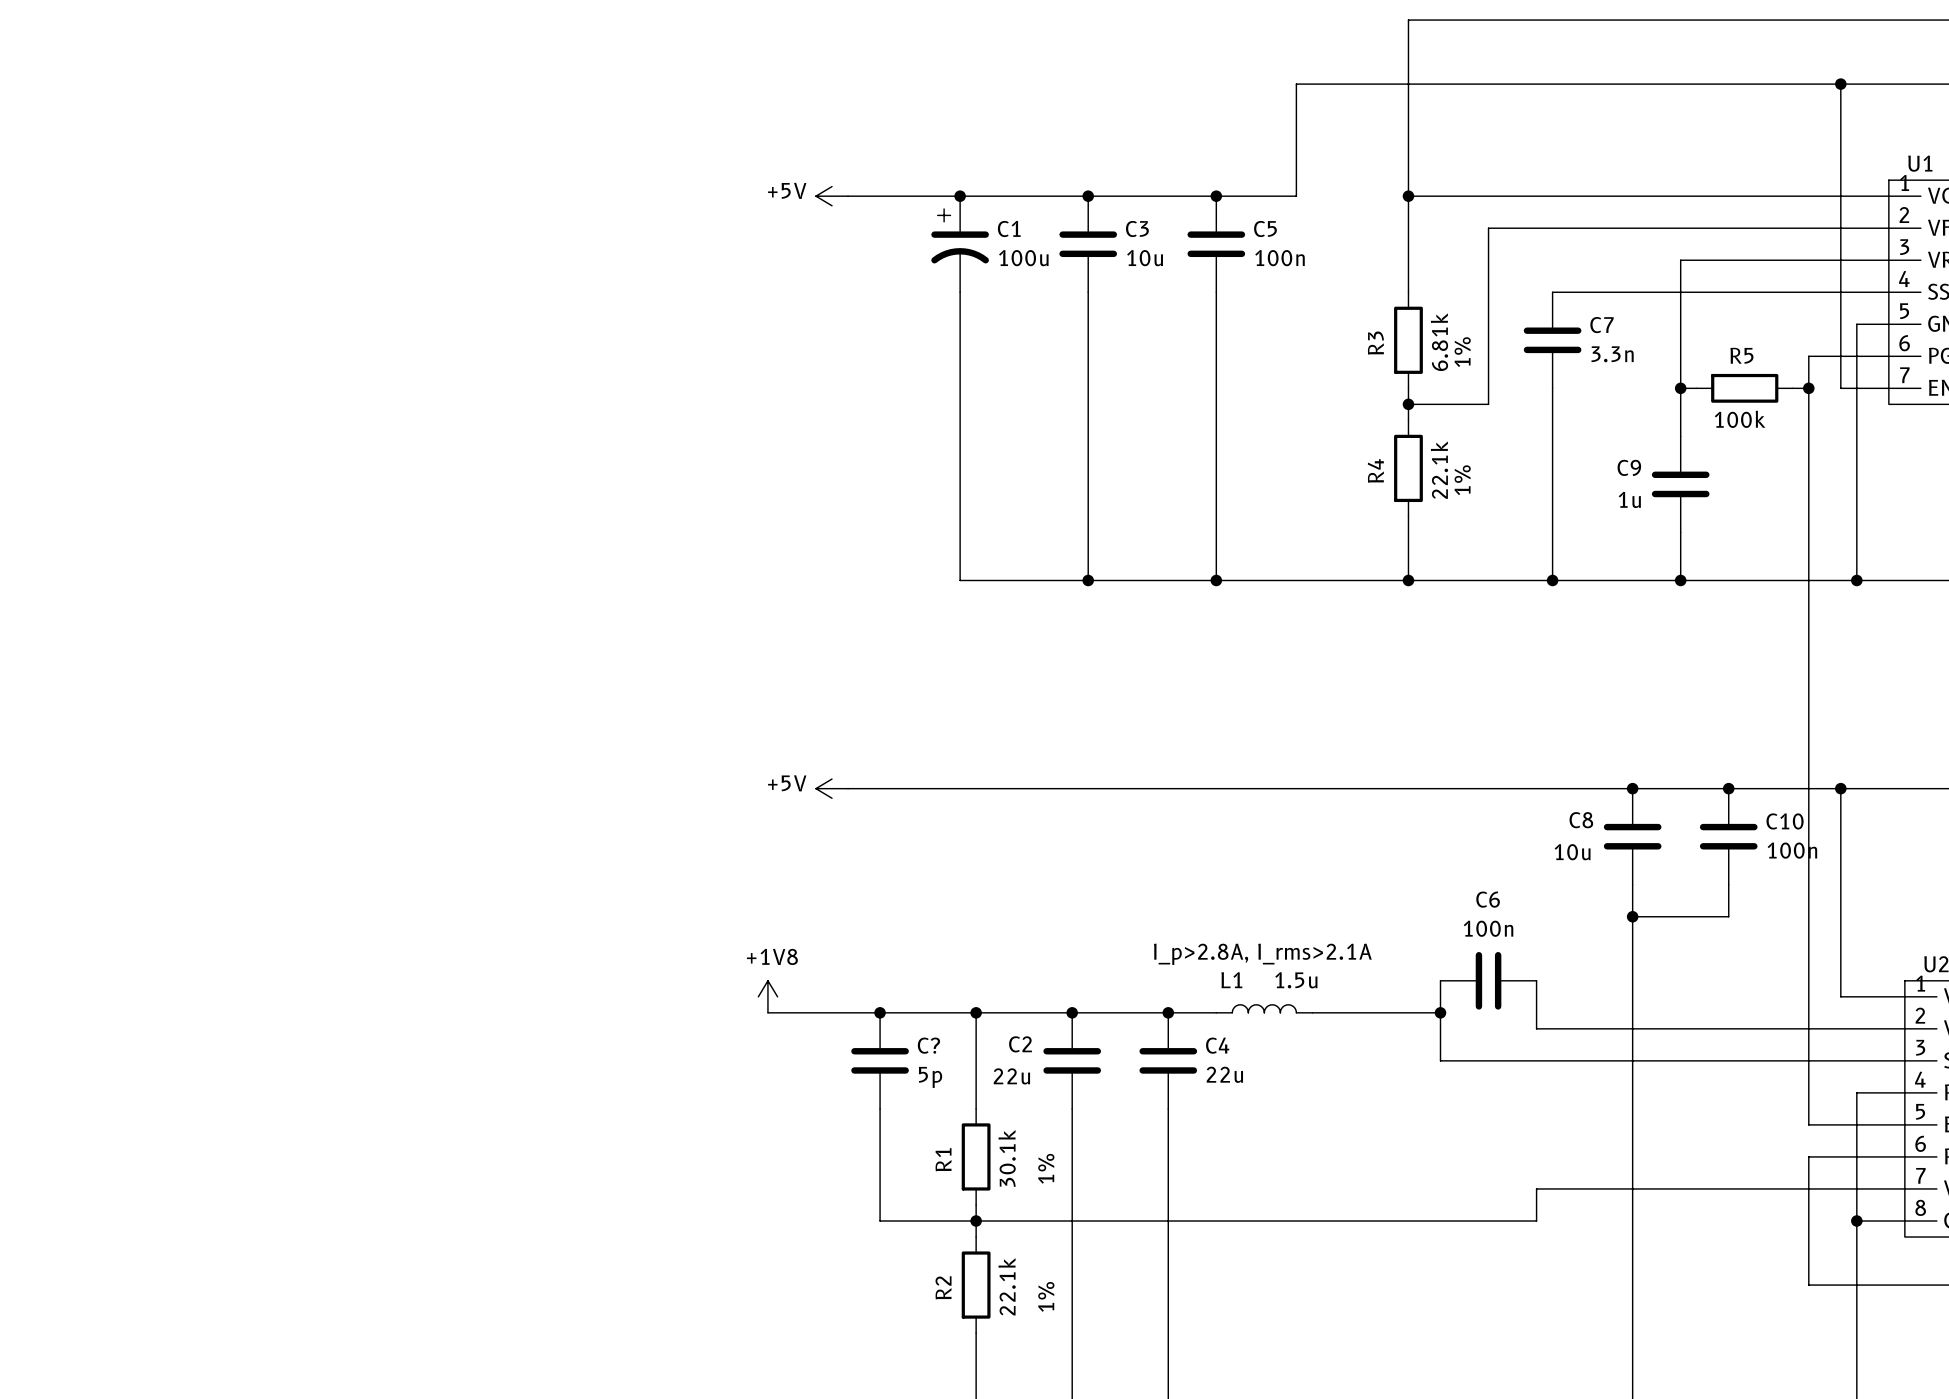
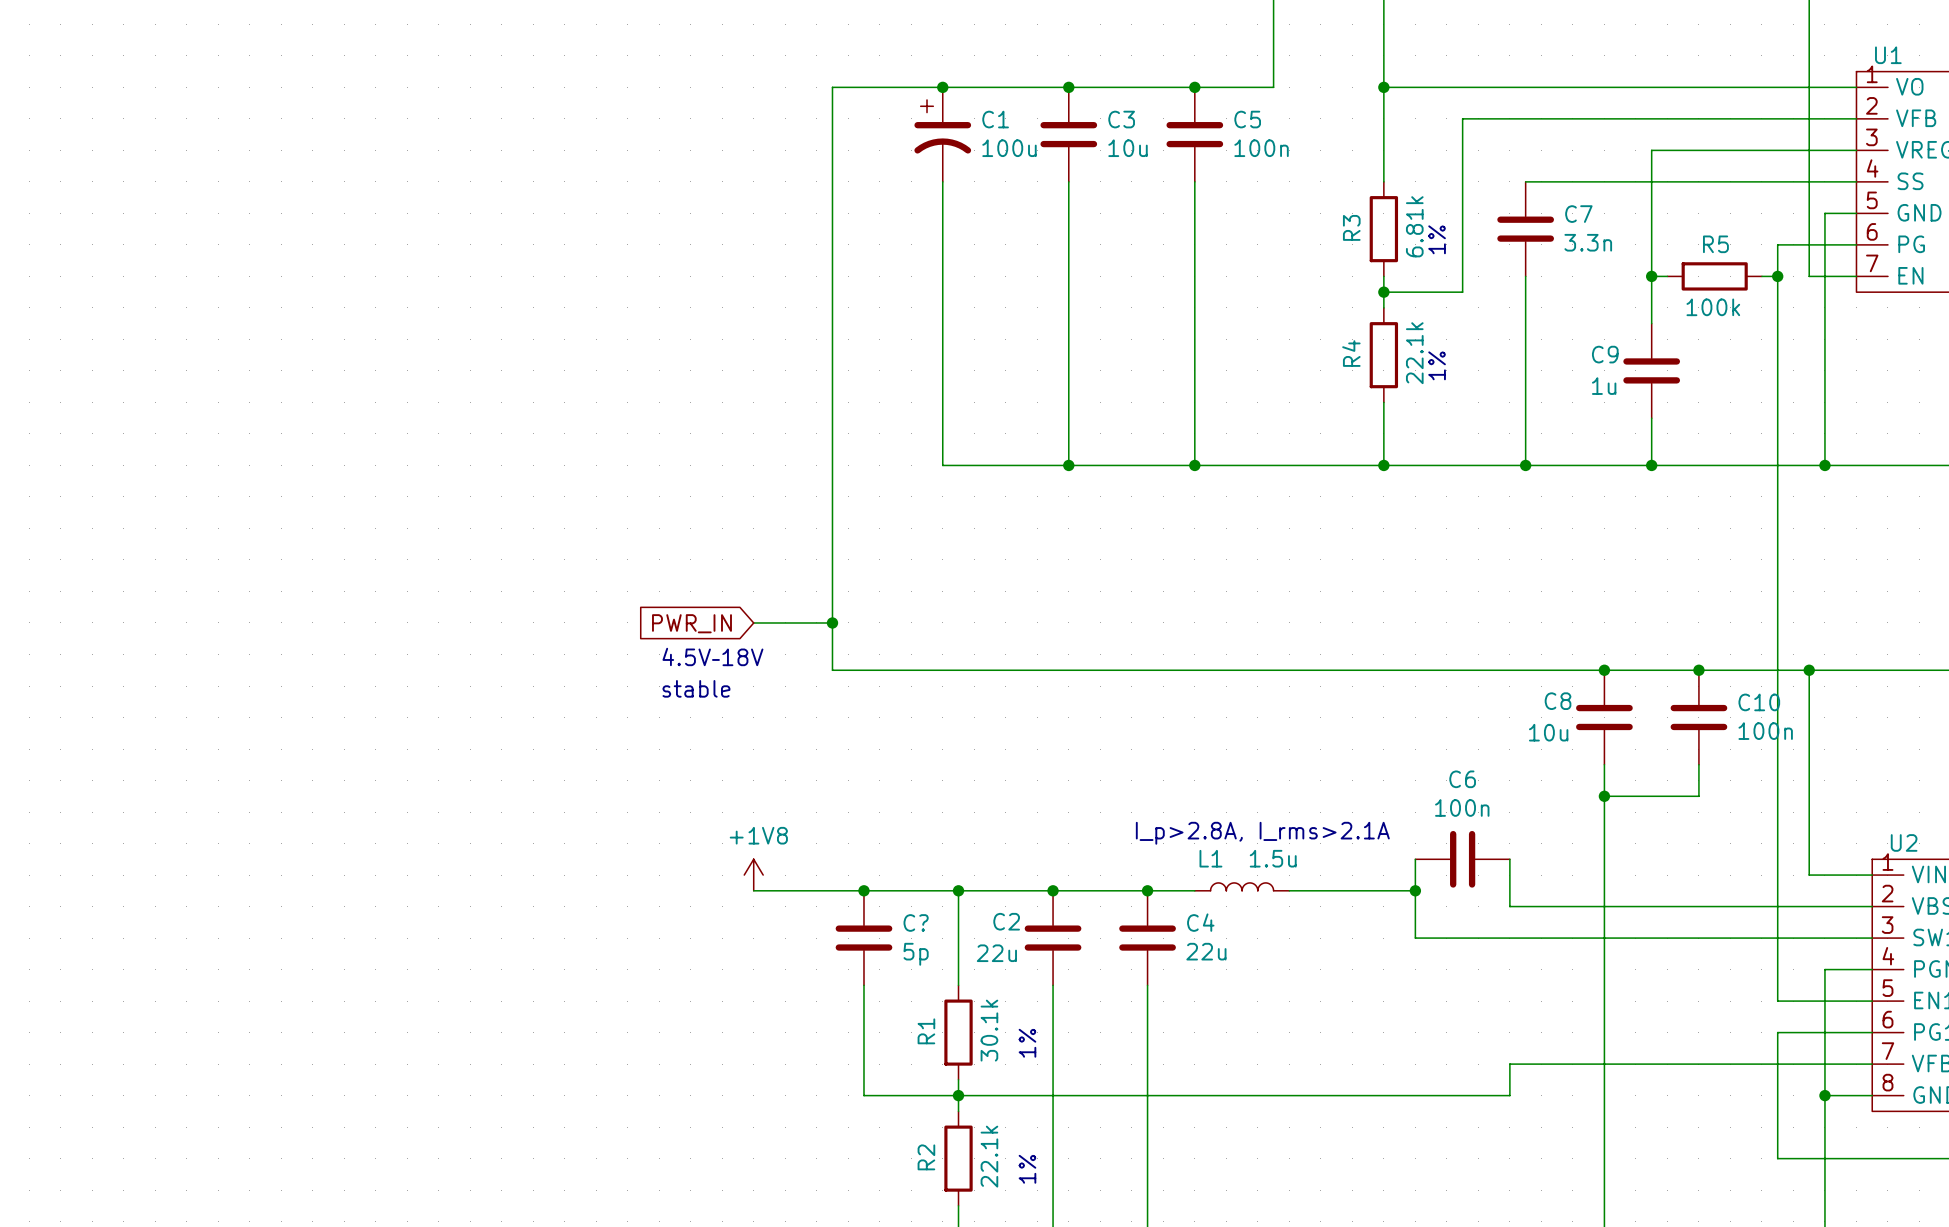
power symbol: +5V (832, 196) -> none
wire: none -> (832, 87) (832, 670)
wire: none -> (753, 622) (832, 622)
junction: none -> (832, 622)
global label: none -> PWR_IN (691, 623)
text: none -> 4.5V–18V (712, 656)
power symbol: +5V (832, 788) -> none
text: none -> stable (696, 688)

